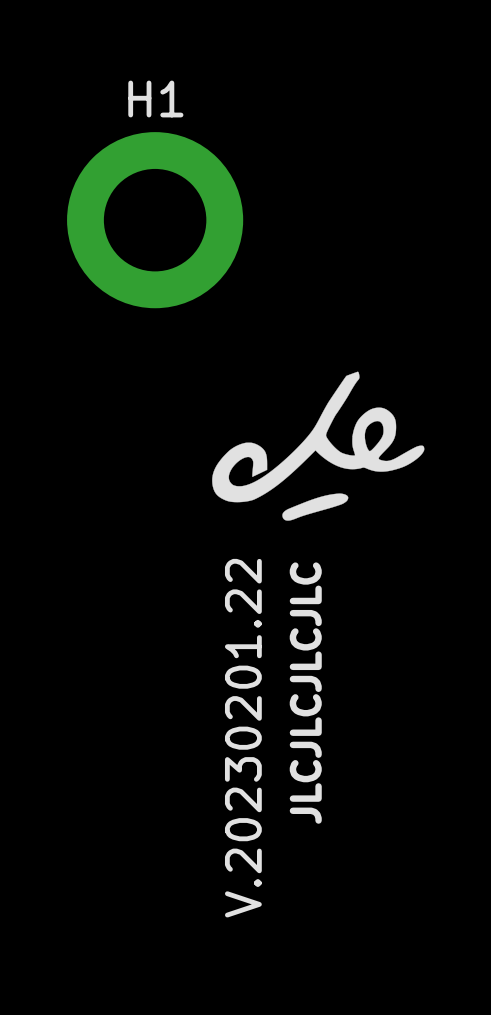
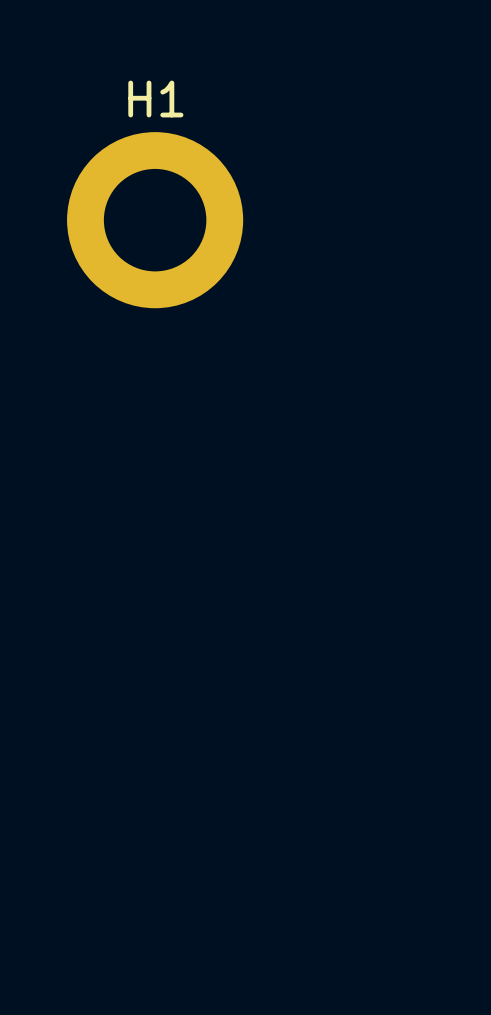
drawing: [212, 371, 425, 521] -> none
text: JLCJLCJLCJLC (305, 693) -> none
text: V.20230201.22 (243, 738) -> none

